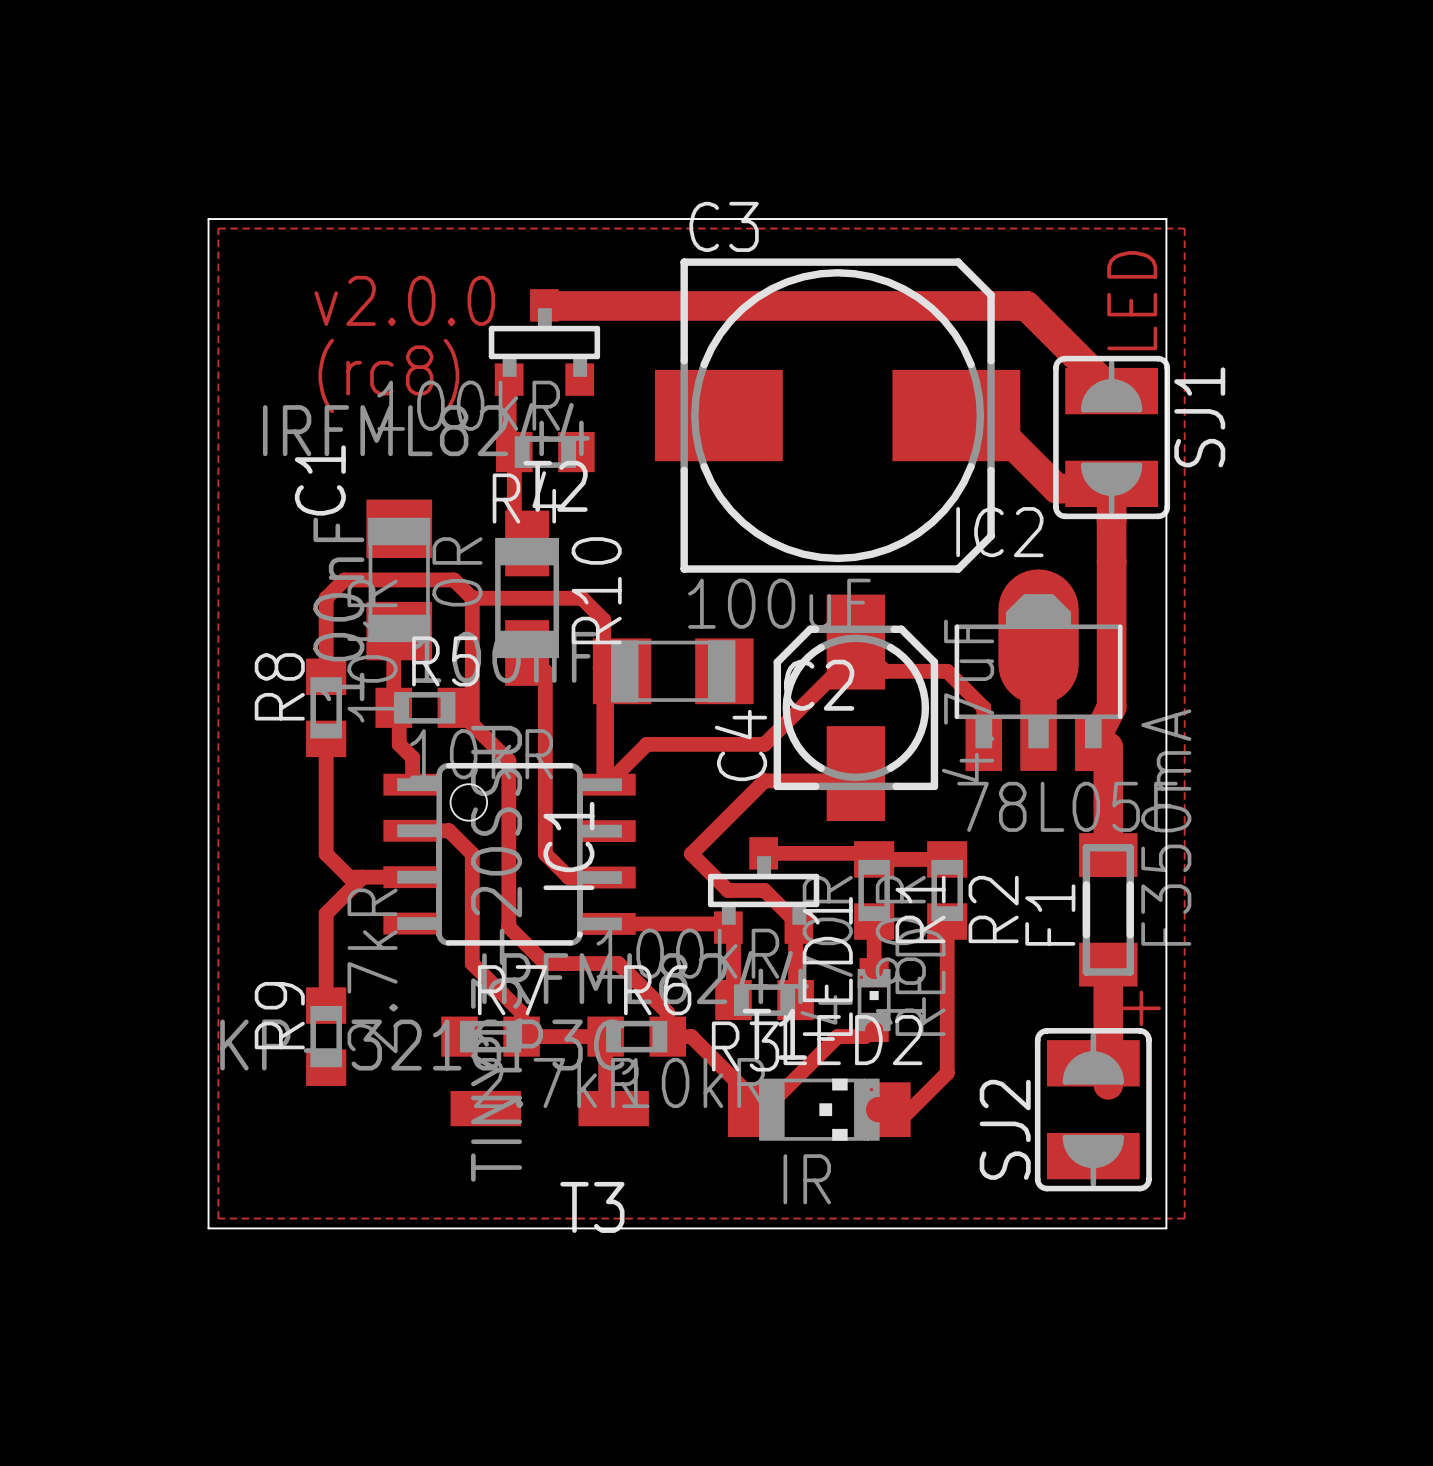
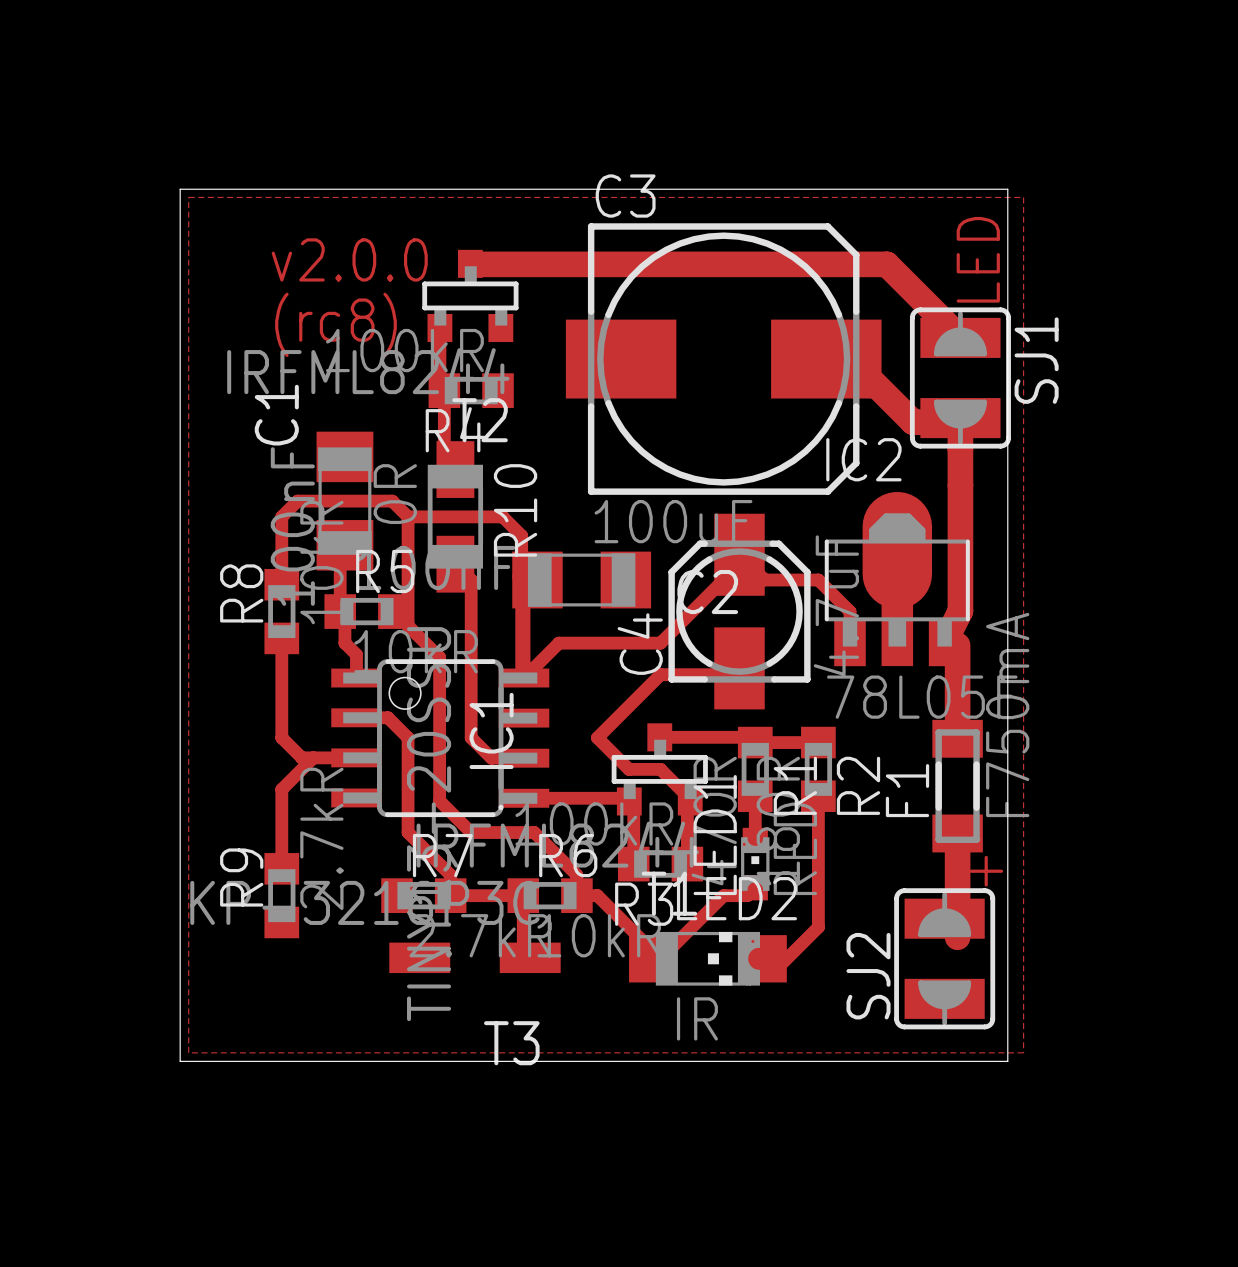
F1 value: F350mA (1166, 827) -> F750mA (1007, 715)

